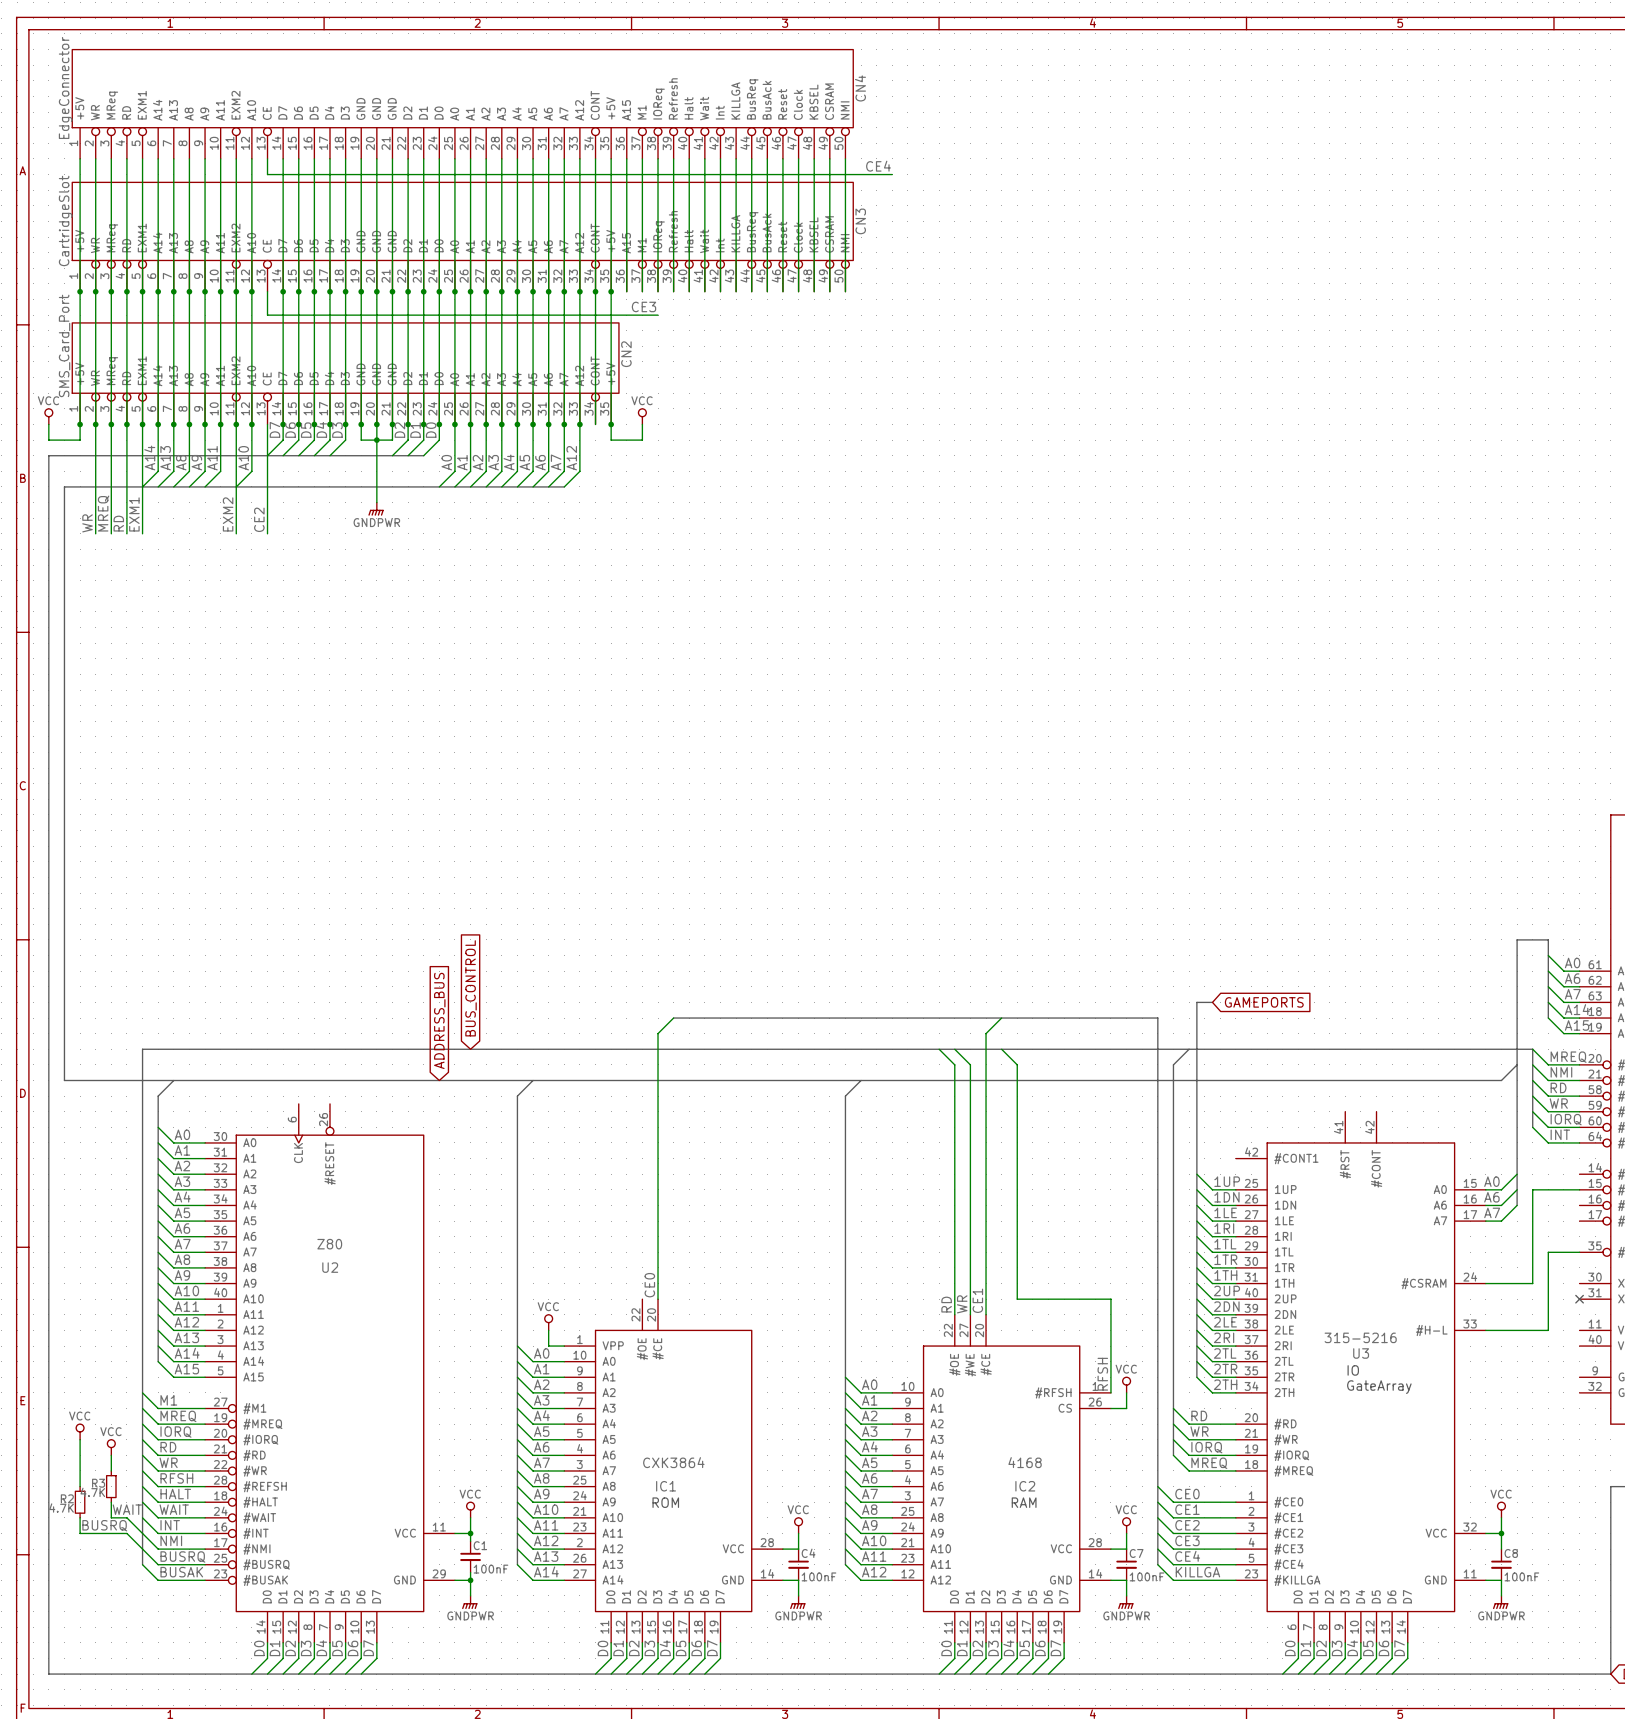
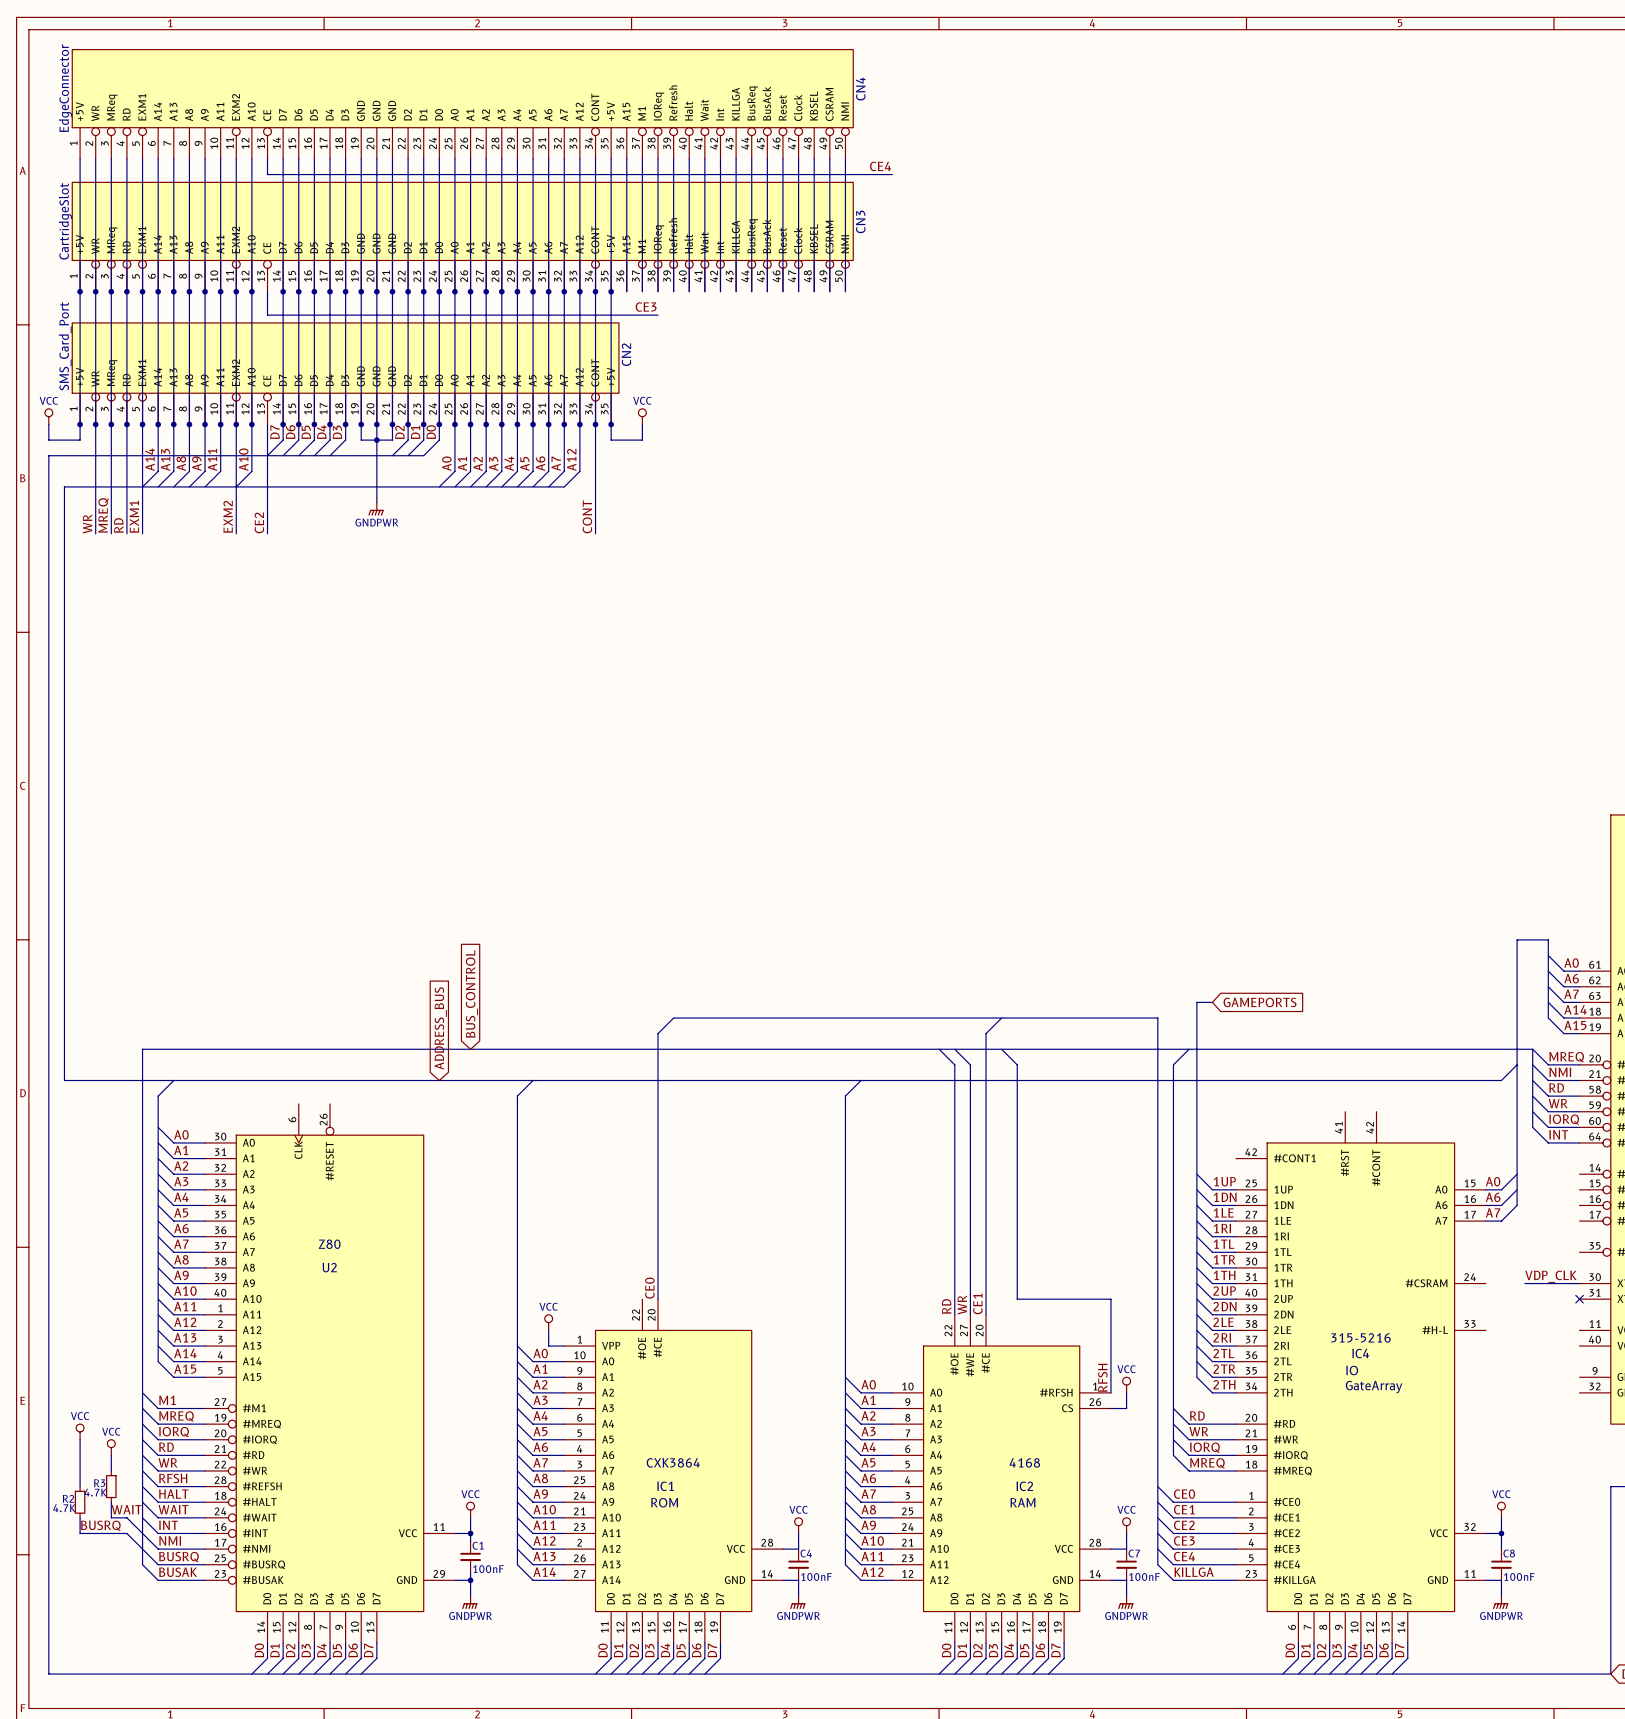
wire: none -> (595, 424) (595, 533)
junction: none -> (595, 424)
label: none -> CONT (587, 516)
wire: (1579, 1189) (1532, 1189) (1532, 1283) -> (1579, 1283) (1532, 1283)
wire: (1579, 1252) (1548, 1252) (1548, 1330) (1485, 1330) -> none
label: none -> VDP_CLK (1550, 1276)
wire: (1485, 1283) (1524, 1283) -> none
U3 name: U3 (1361, 1353) -> IC4 (1360, 1353)

